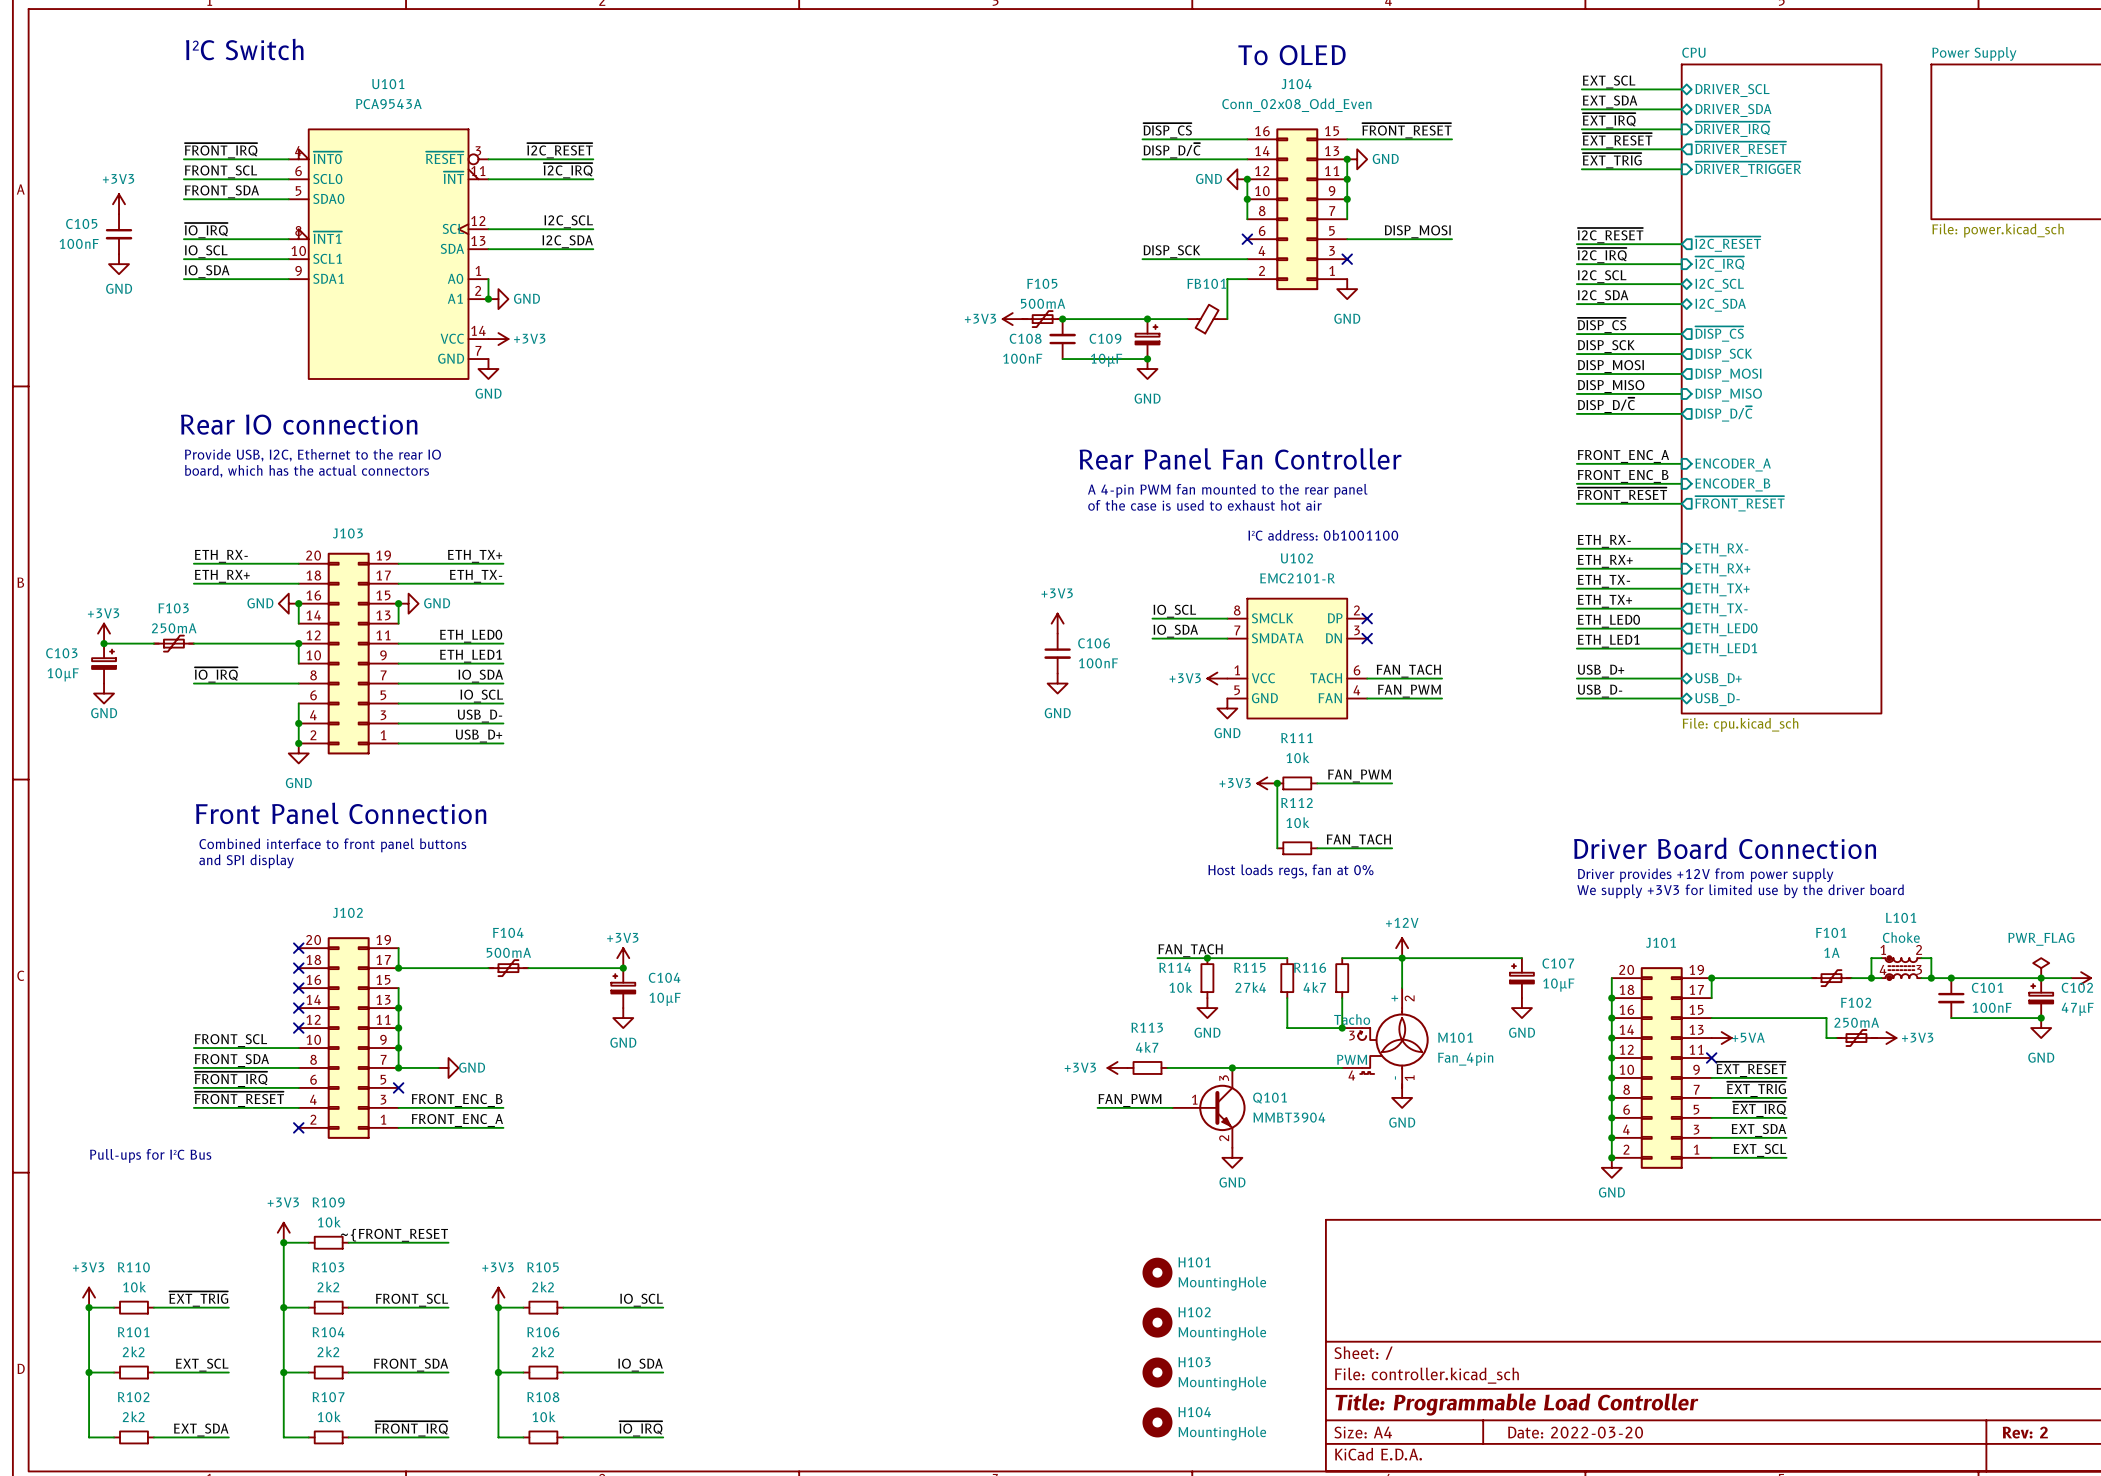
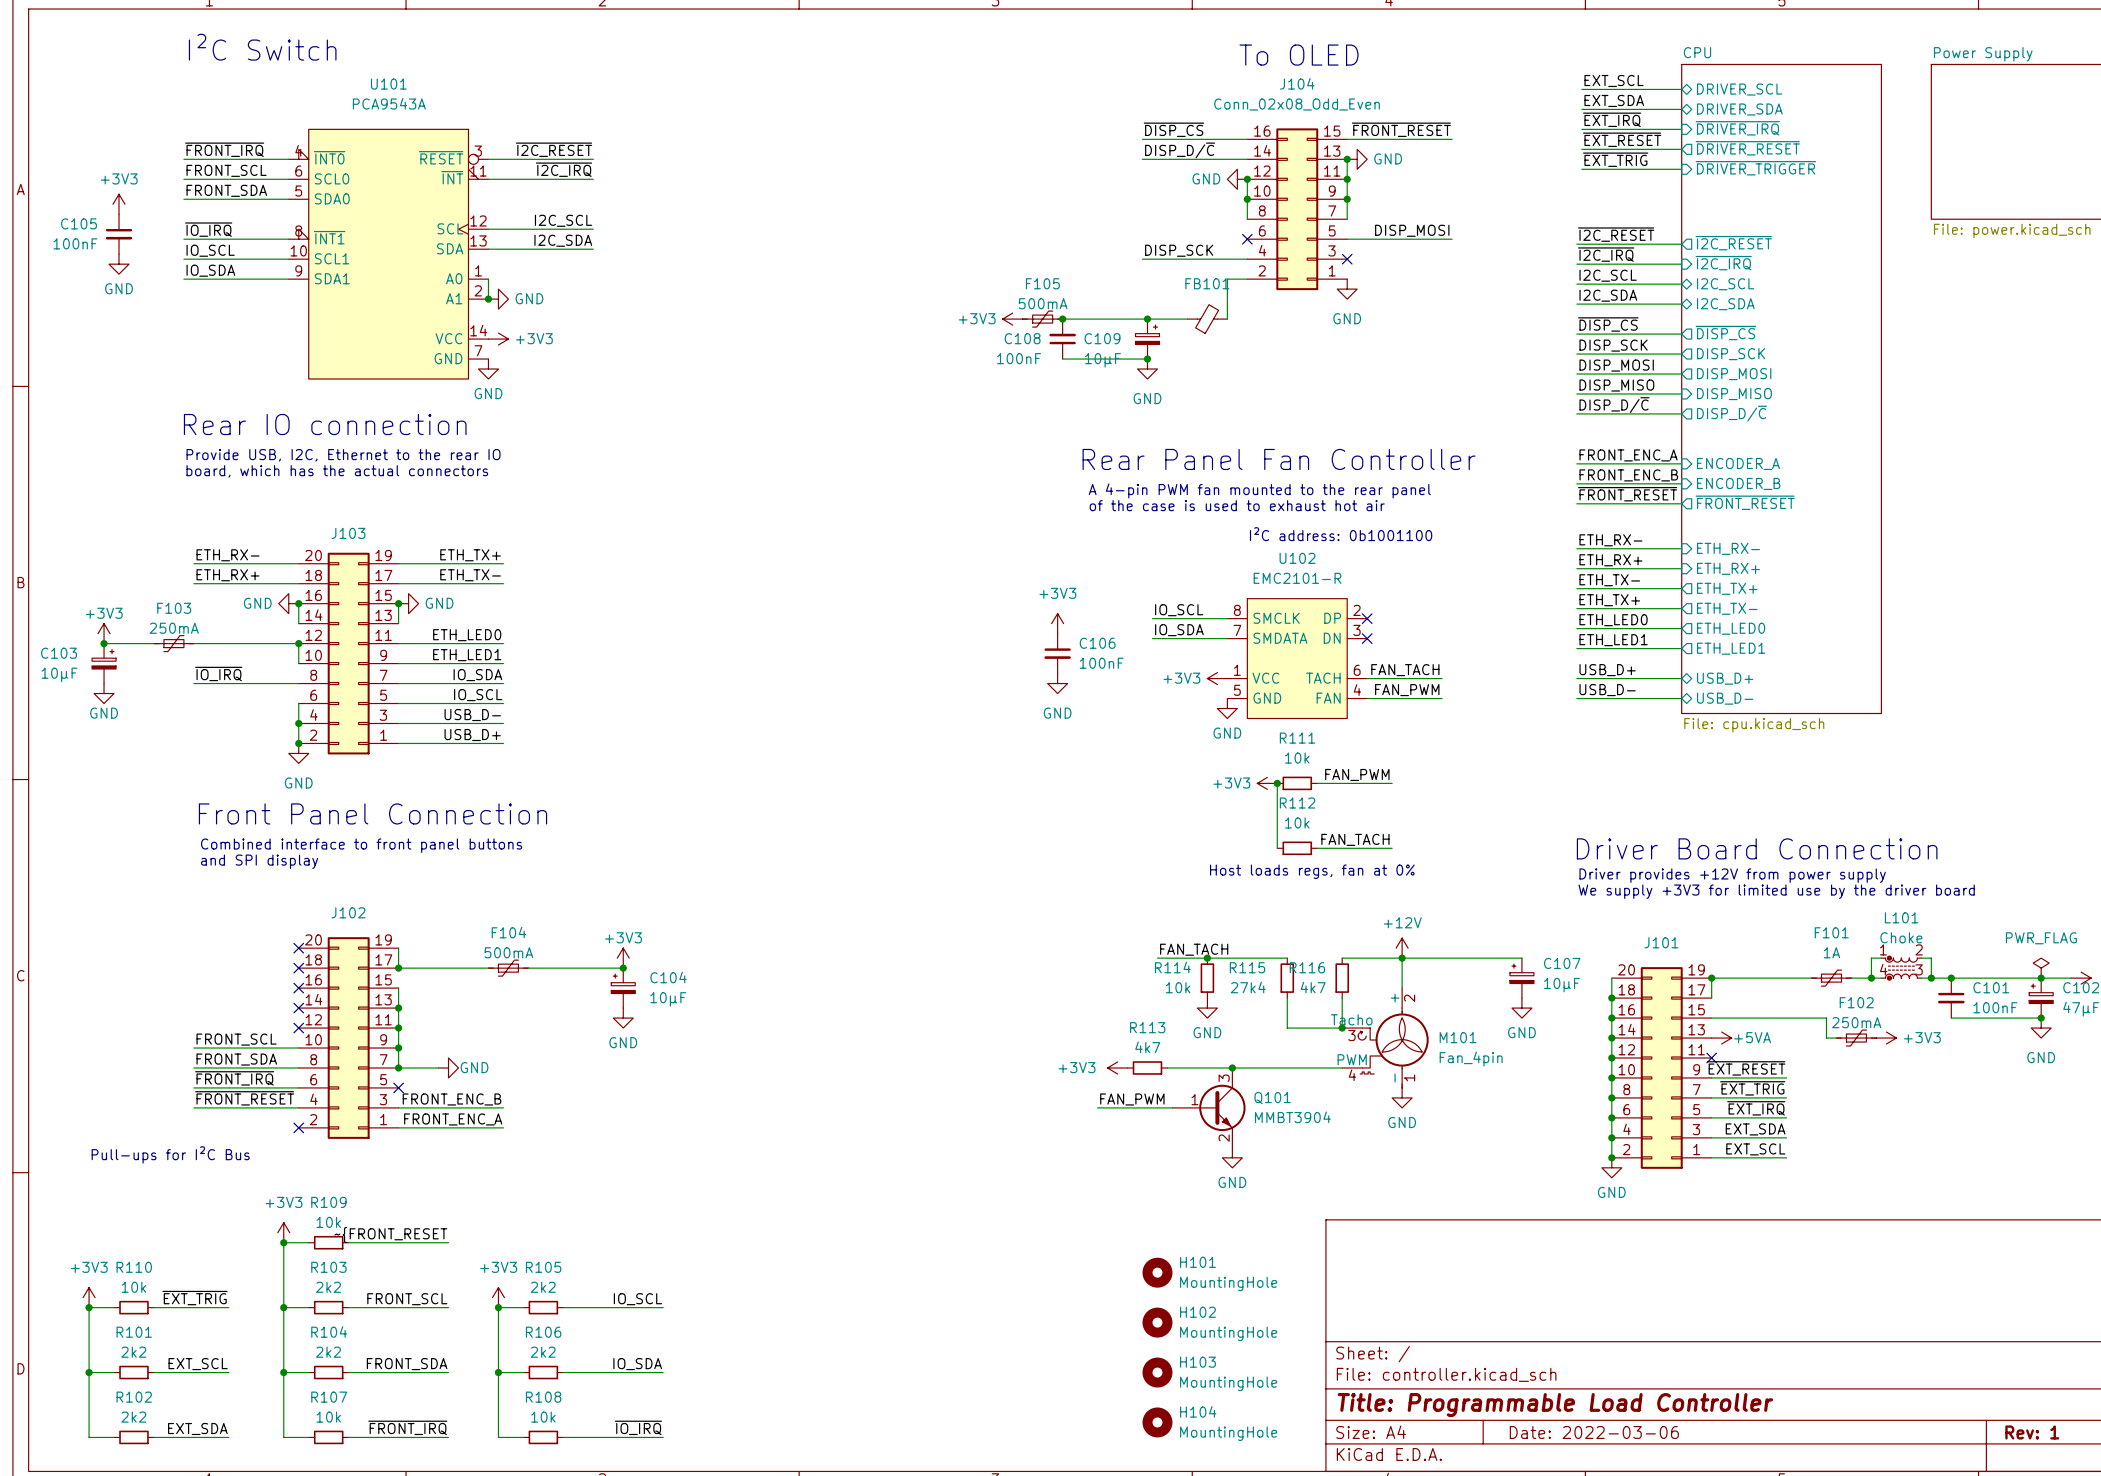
title block: Date: 2022-03-20 (1575, 1432) -> Date: 2022-03-06 (1594, 1432)
title block: Rev: 2 (2025, 1432) -> Rev: 1 (2032, 1432)

